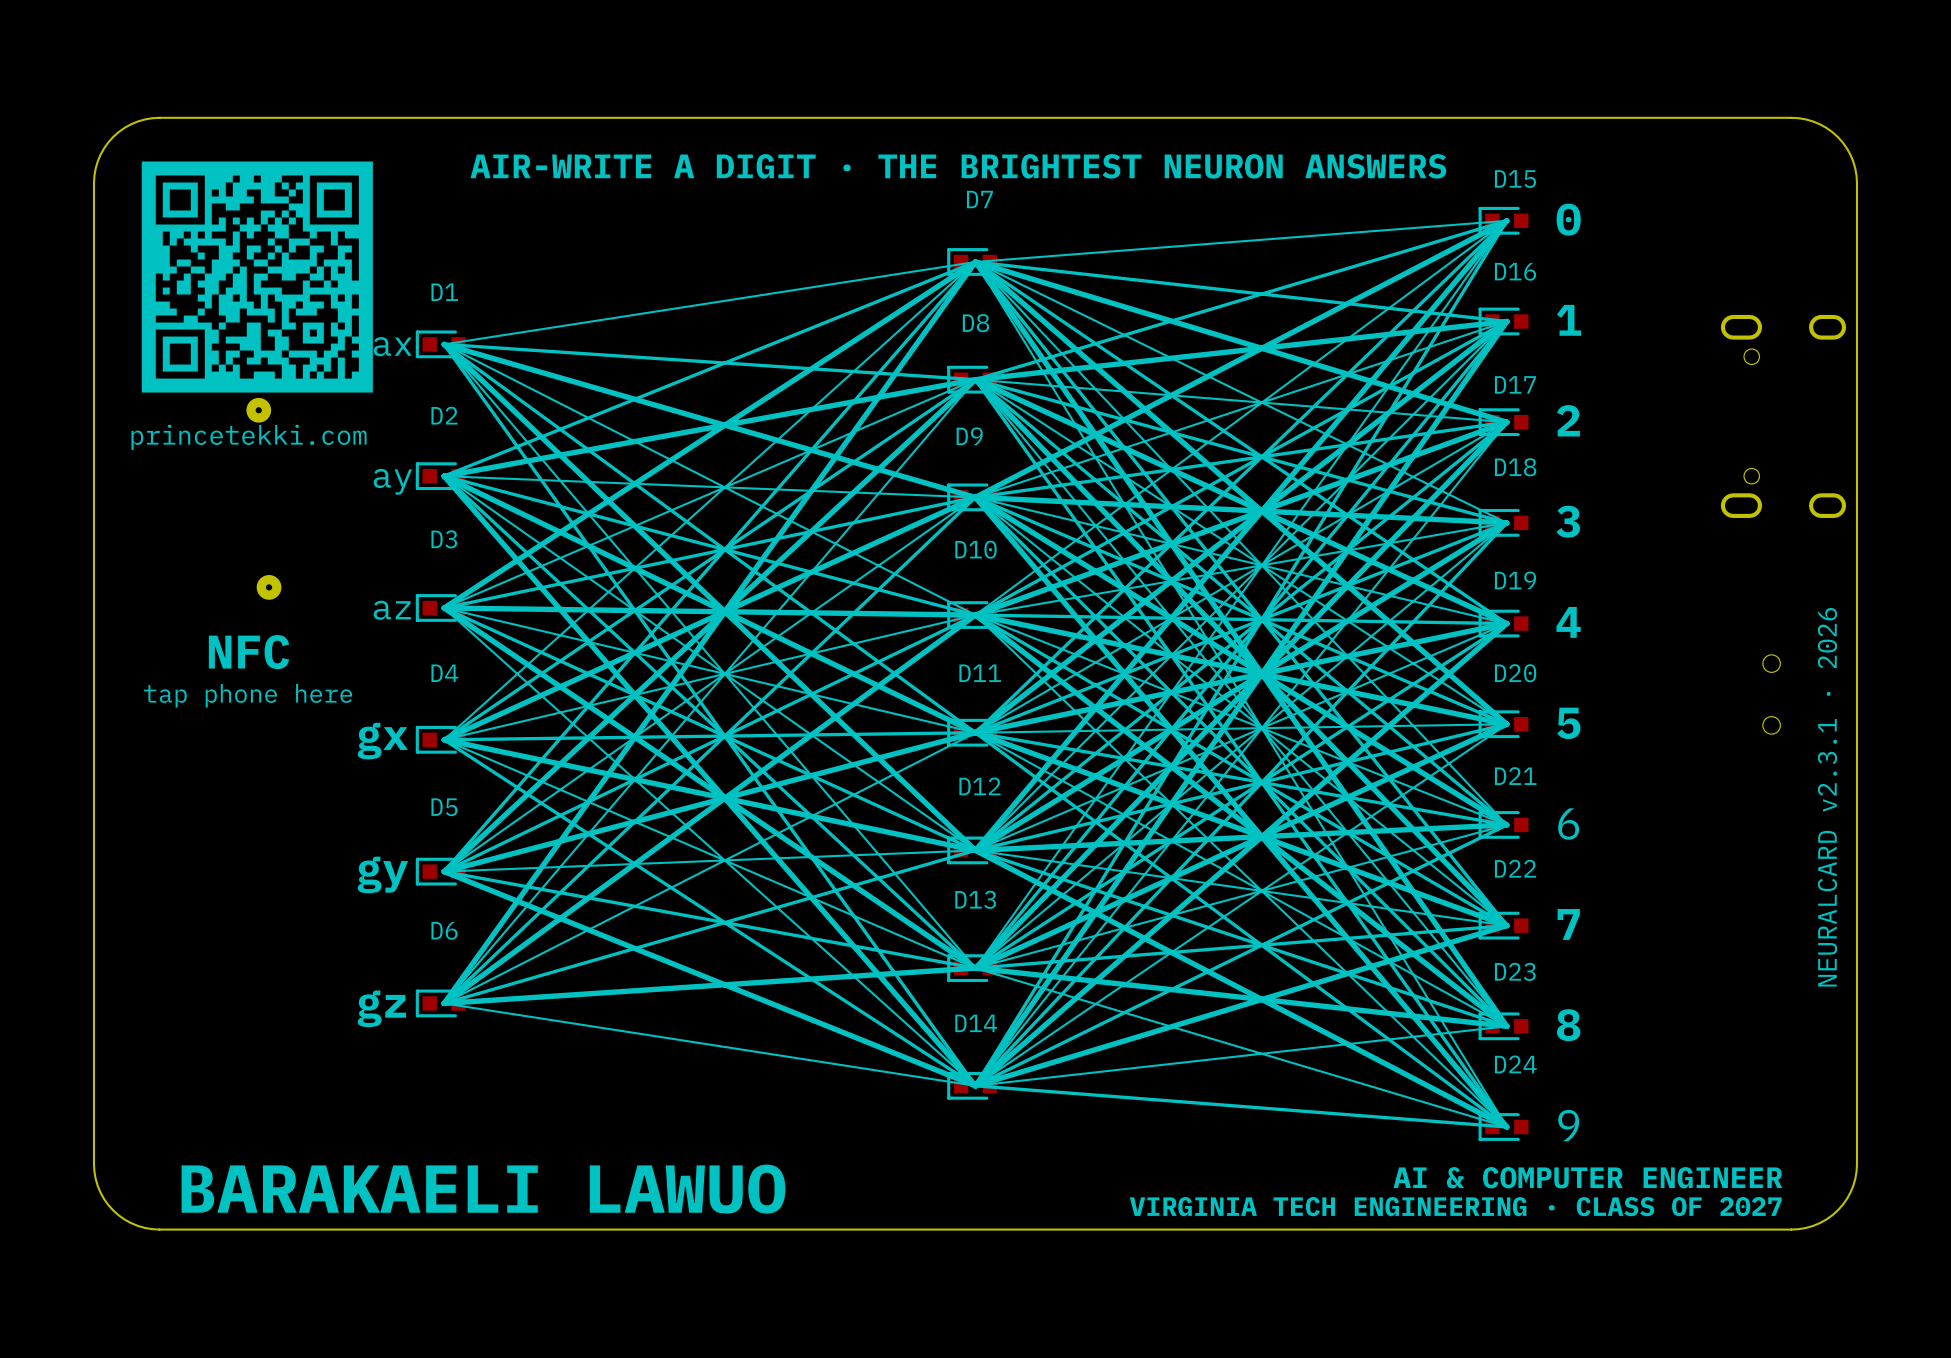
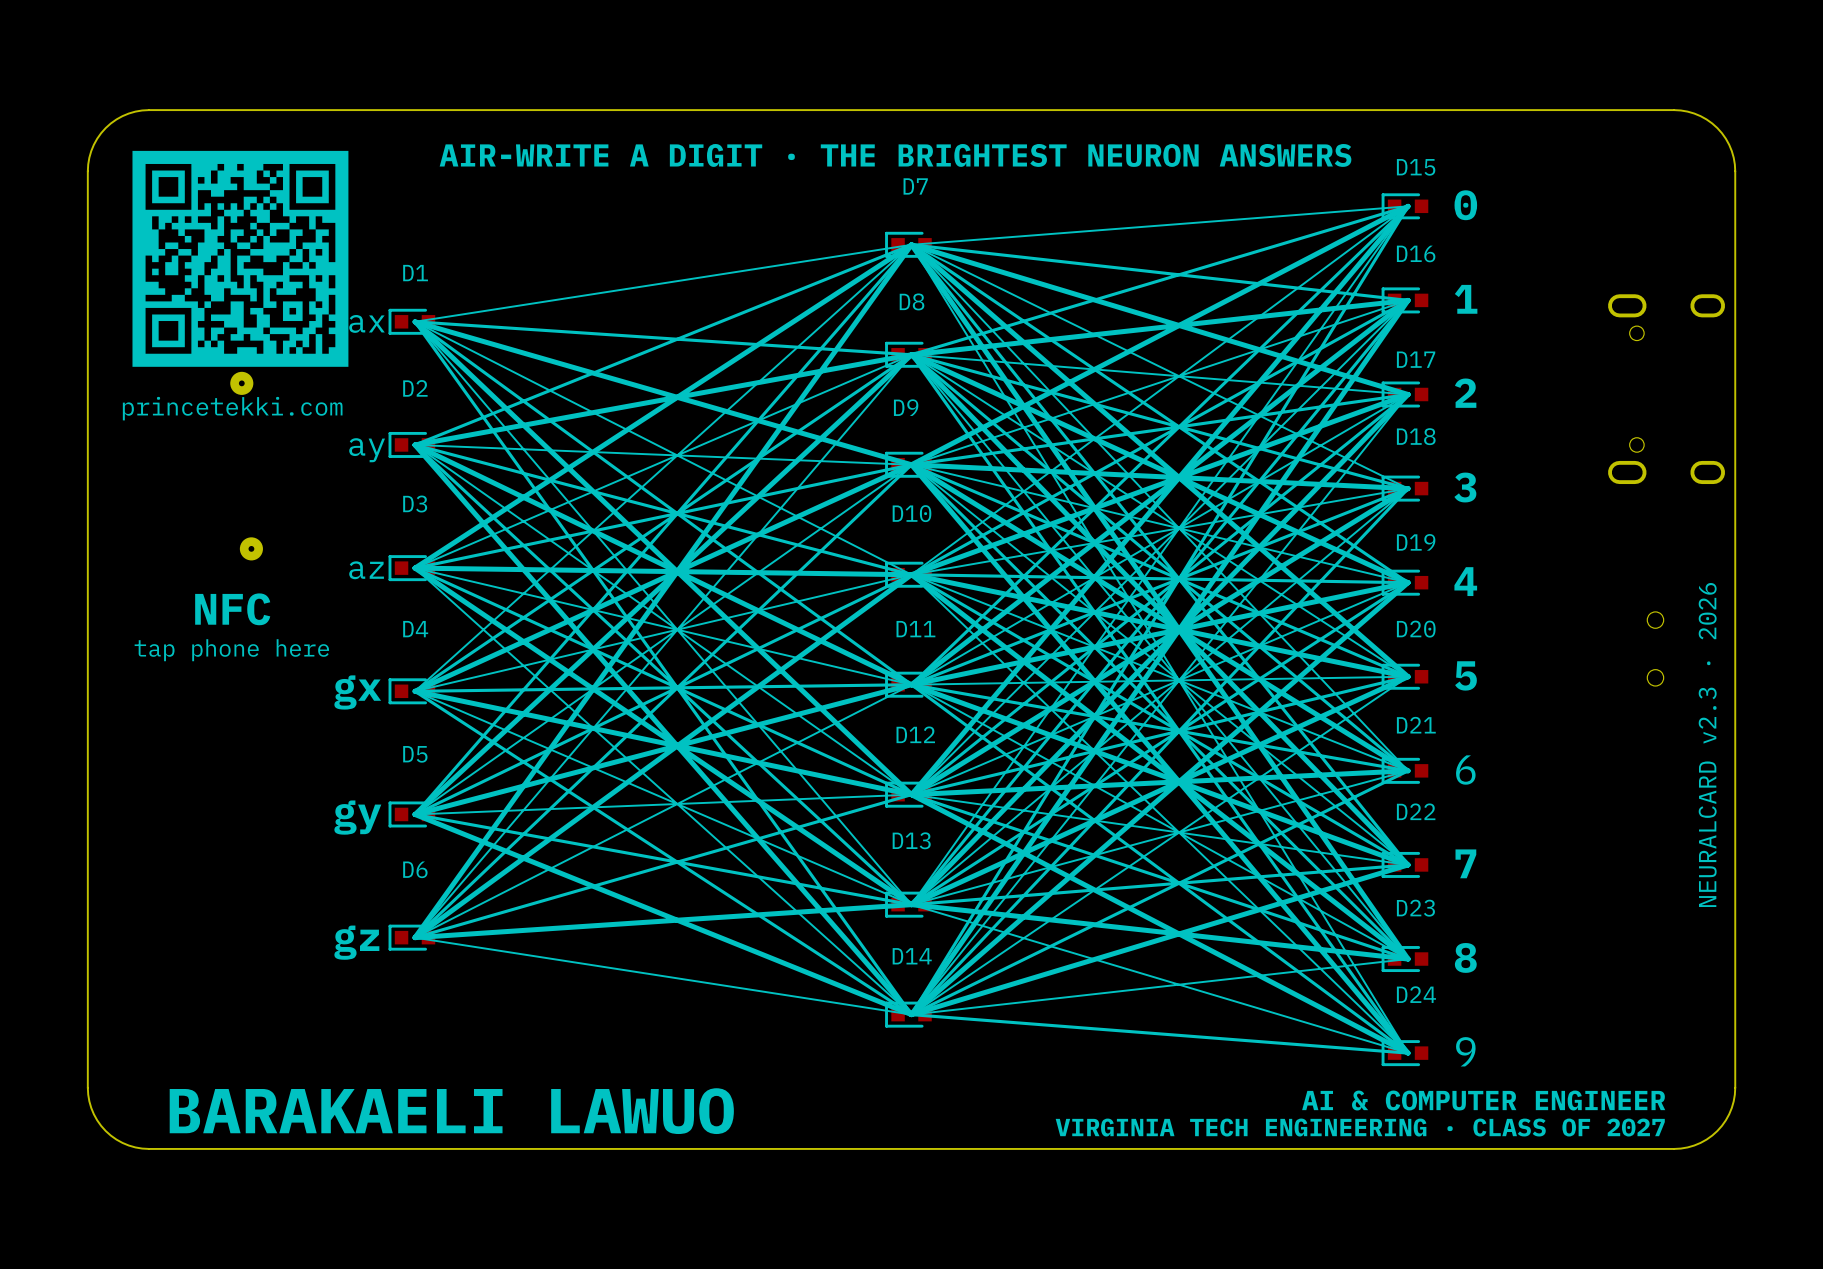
text: NEURALCARD v2.3.1 · 2026 (1827, 797) -> NEURALCARD v2.3 · 2026 (1707, 744)

